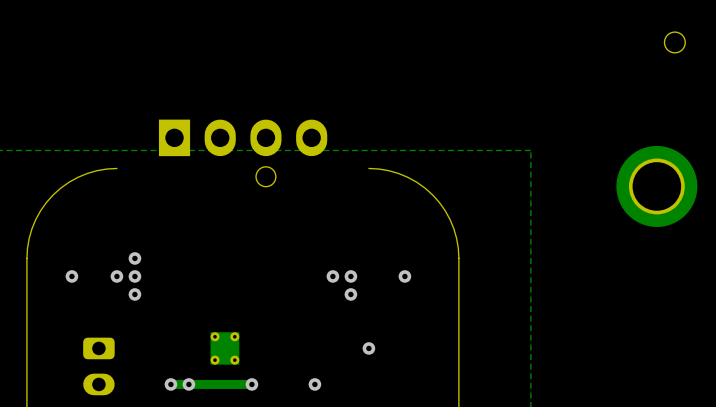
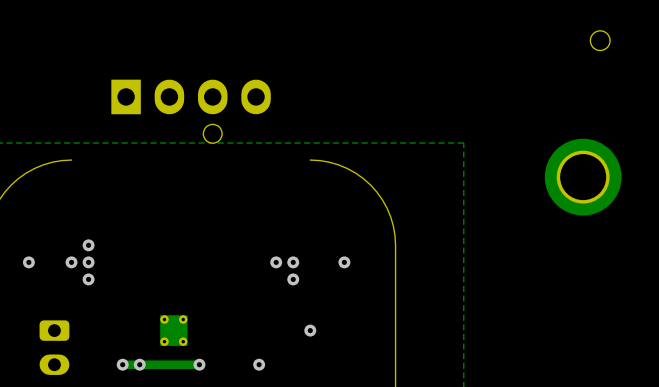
part position: (243, 153) -> (191, 111)

